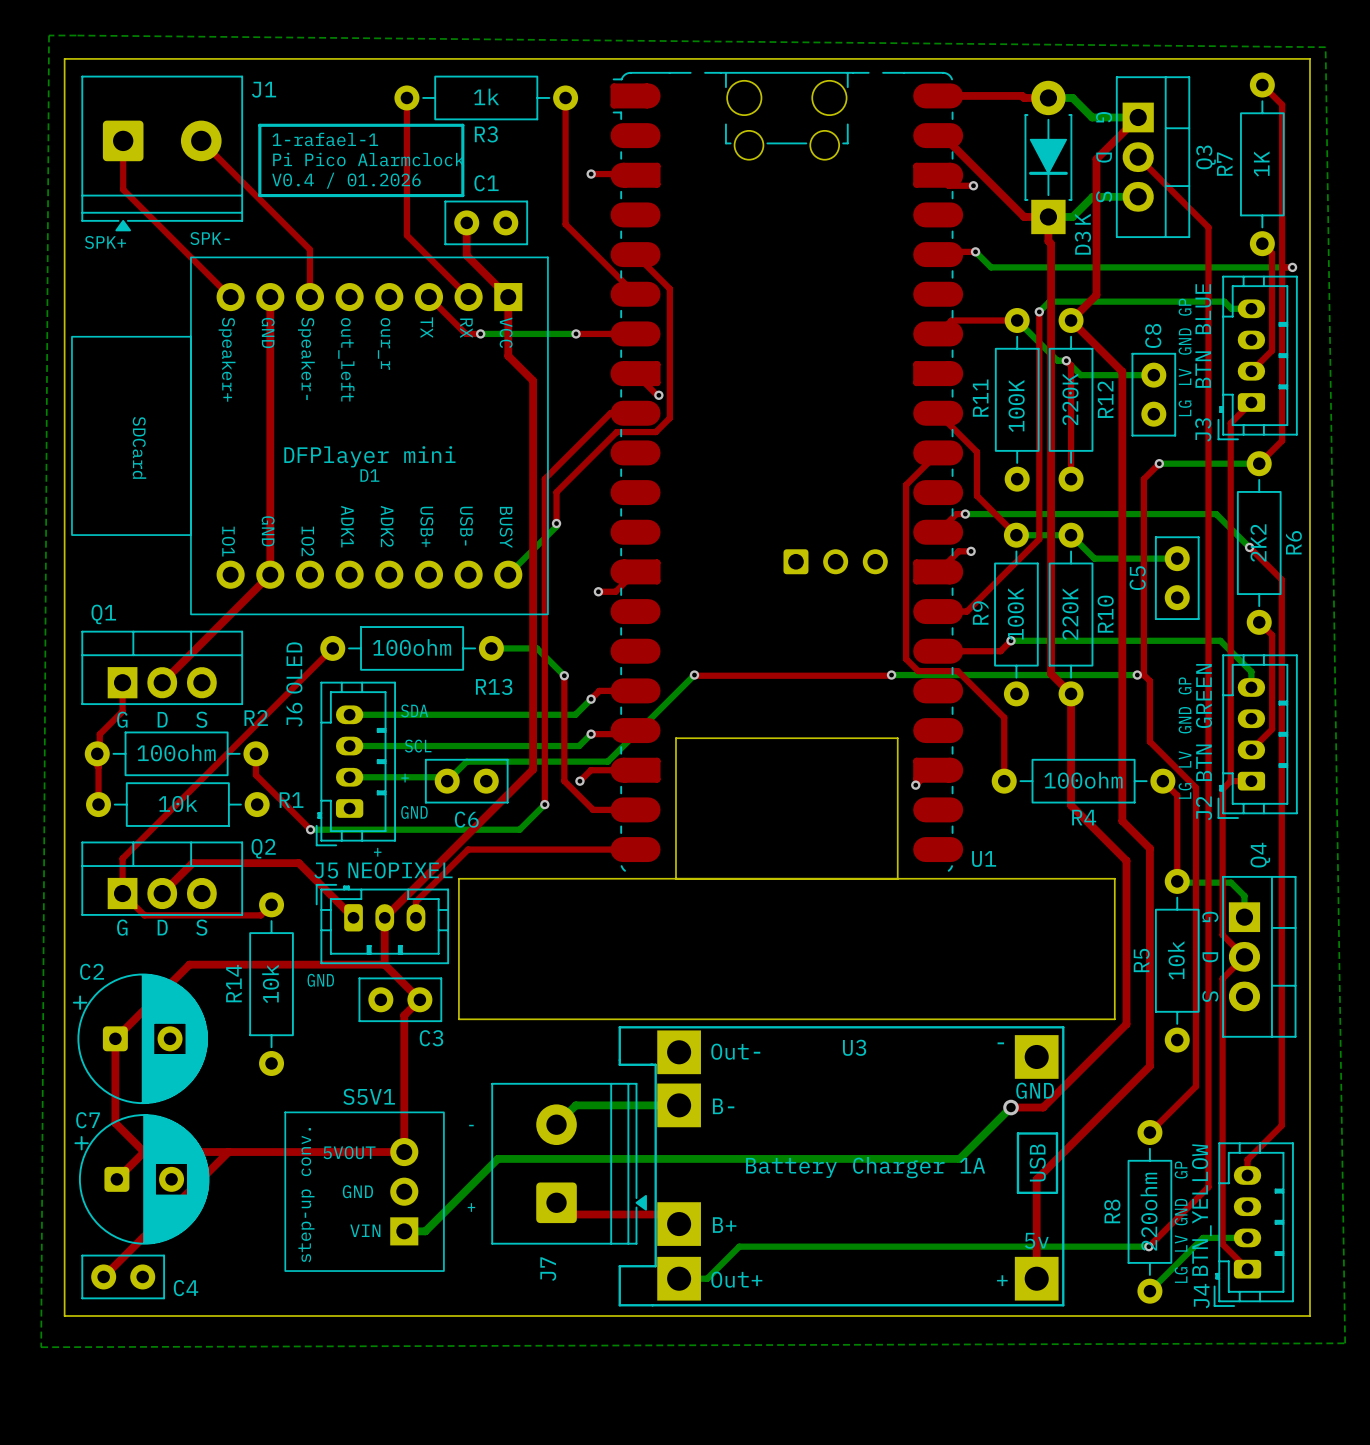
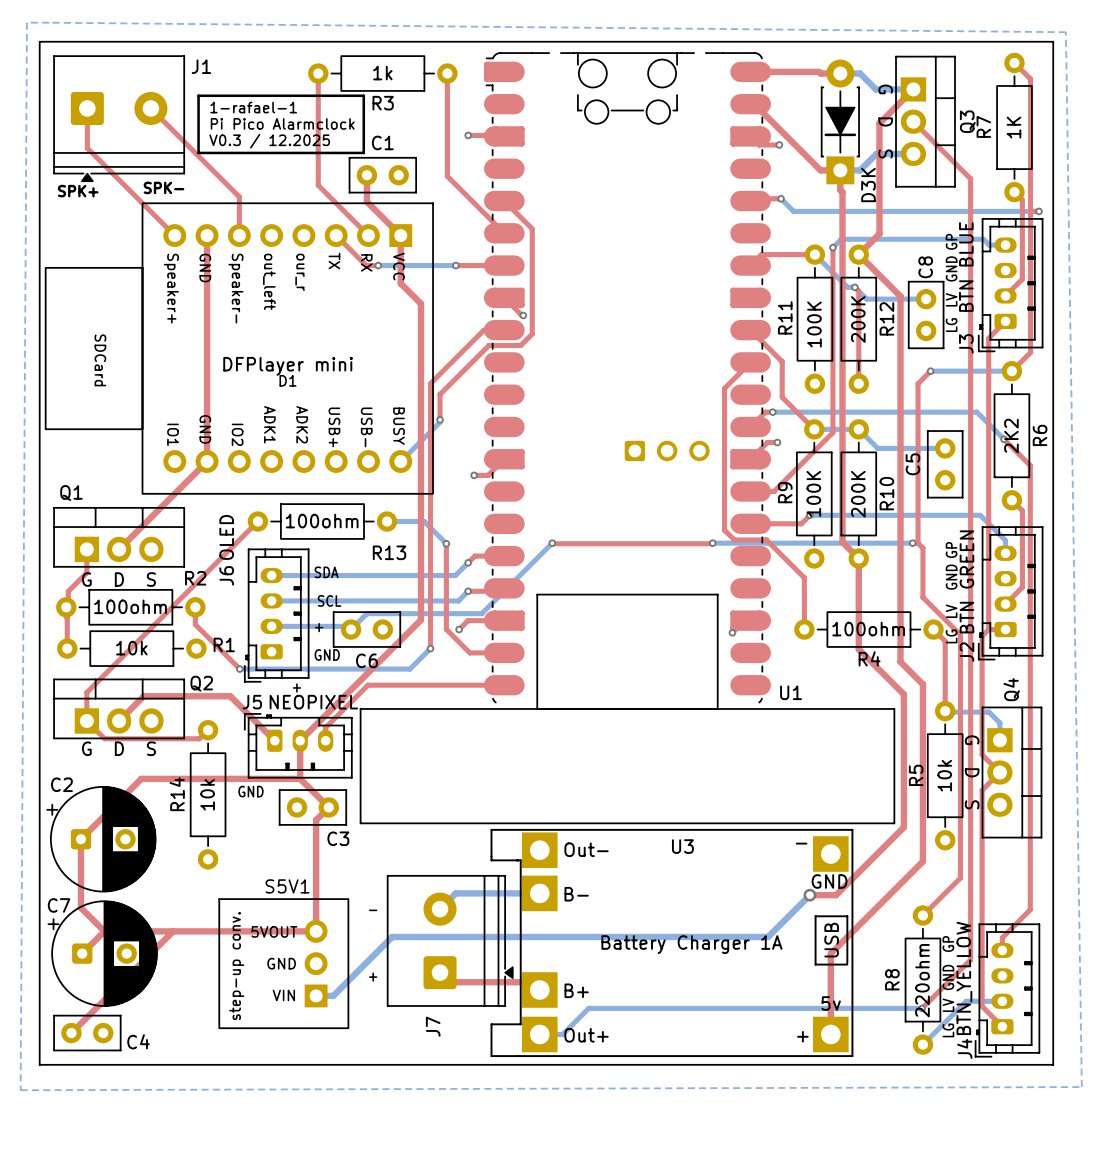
text: V0.4 / 01.2026 (346, 180) -> V0.3 / 12.2025 (269, 141)
R12 value: 220K (1070, 399) -> 200K (858, 319)
R10 value: 220K (1070, 614) -> 200K (858, 494)

